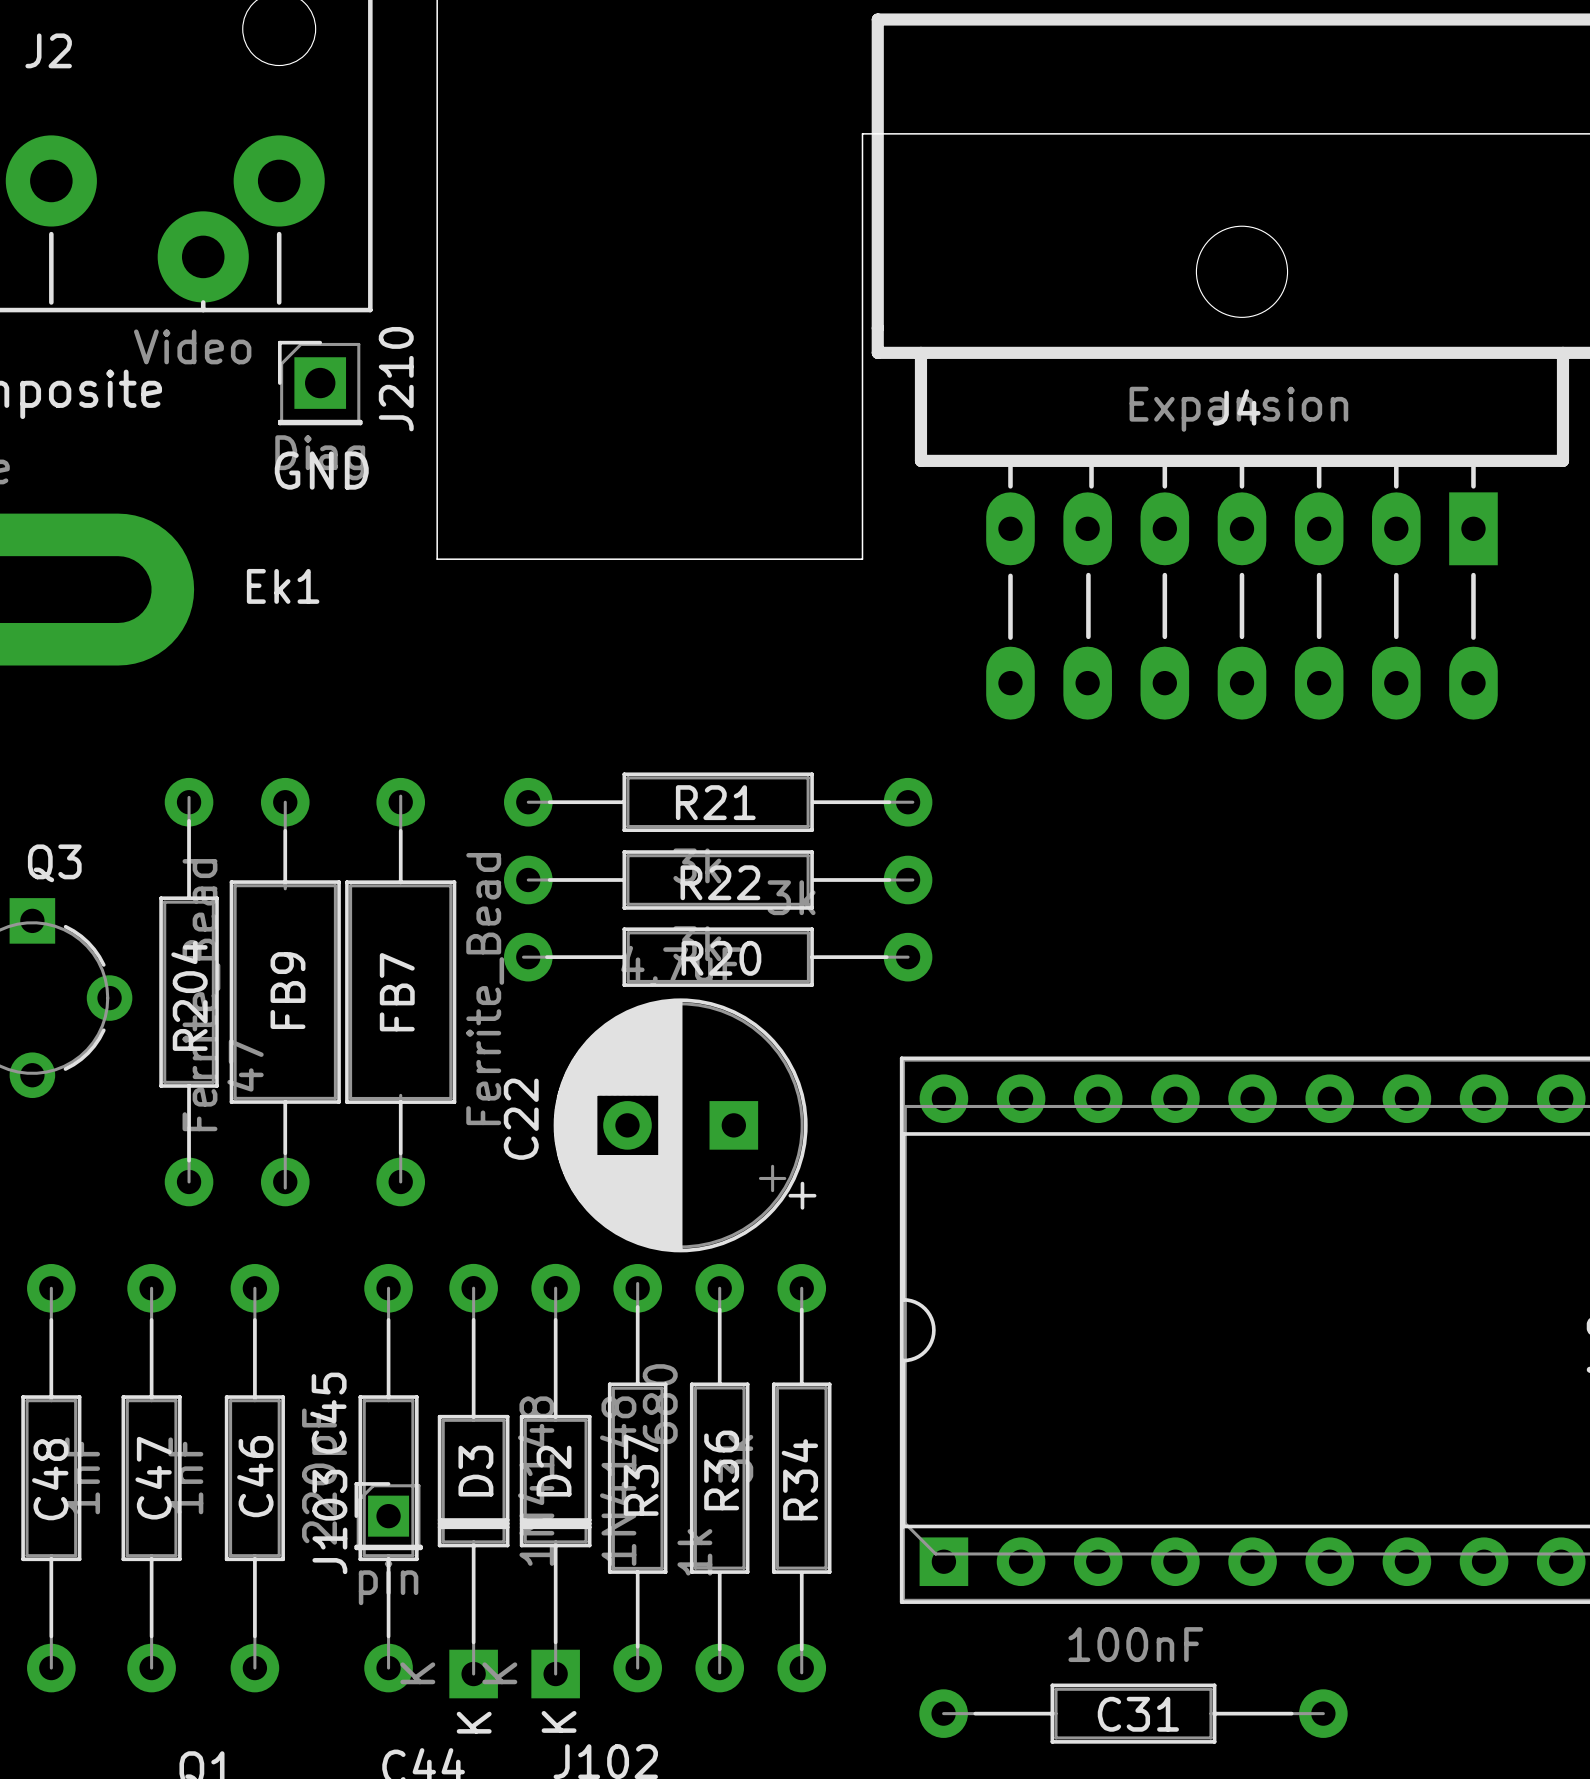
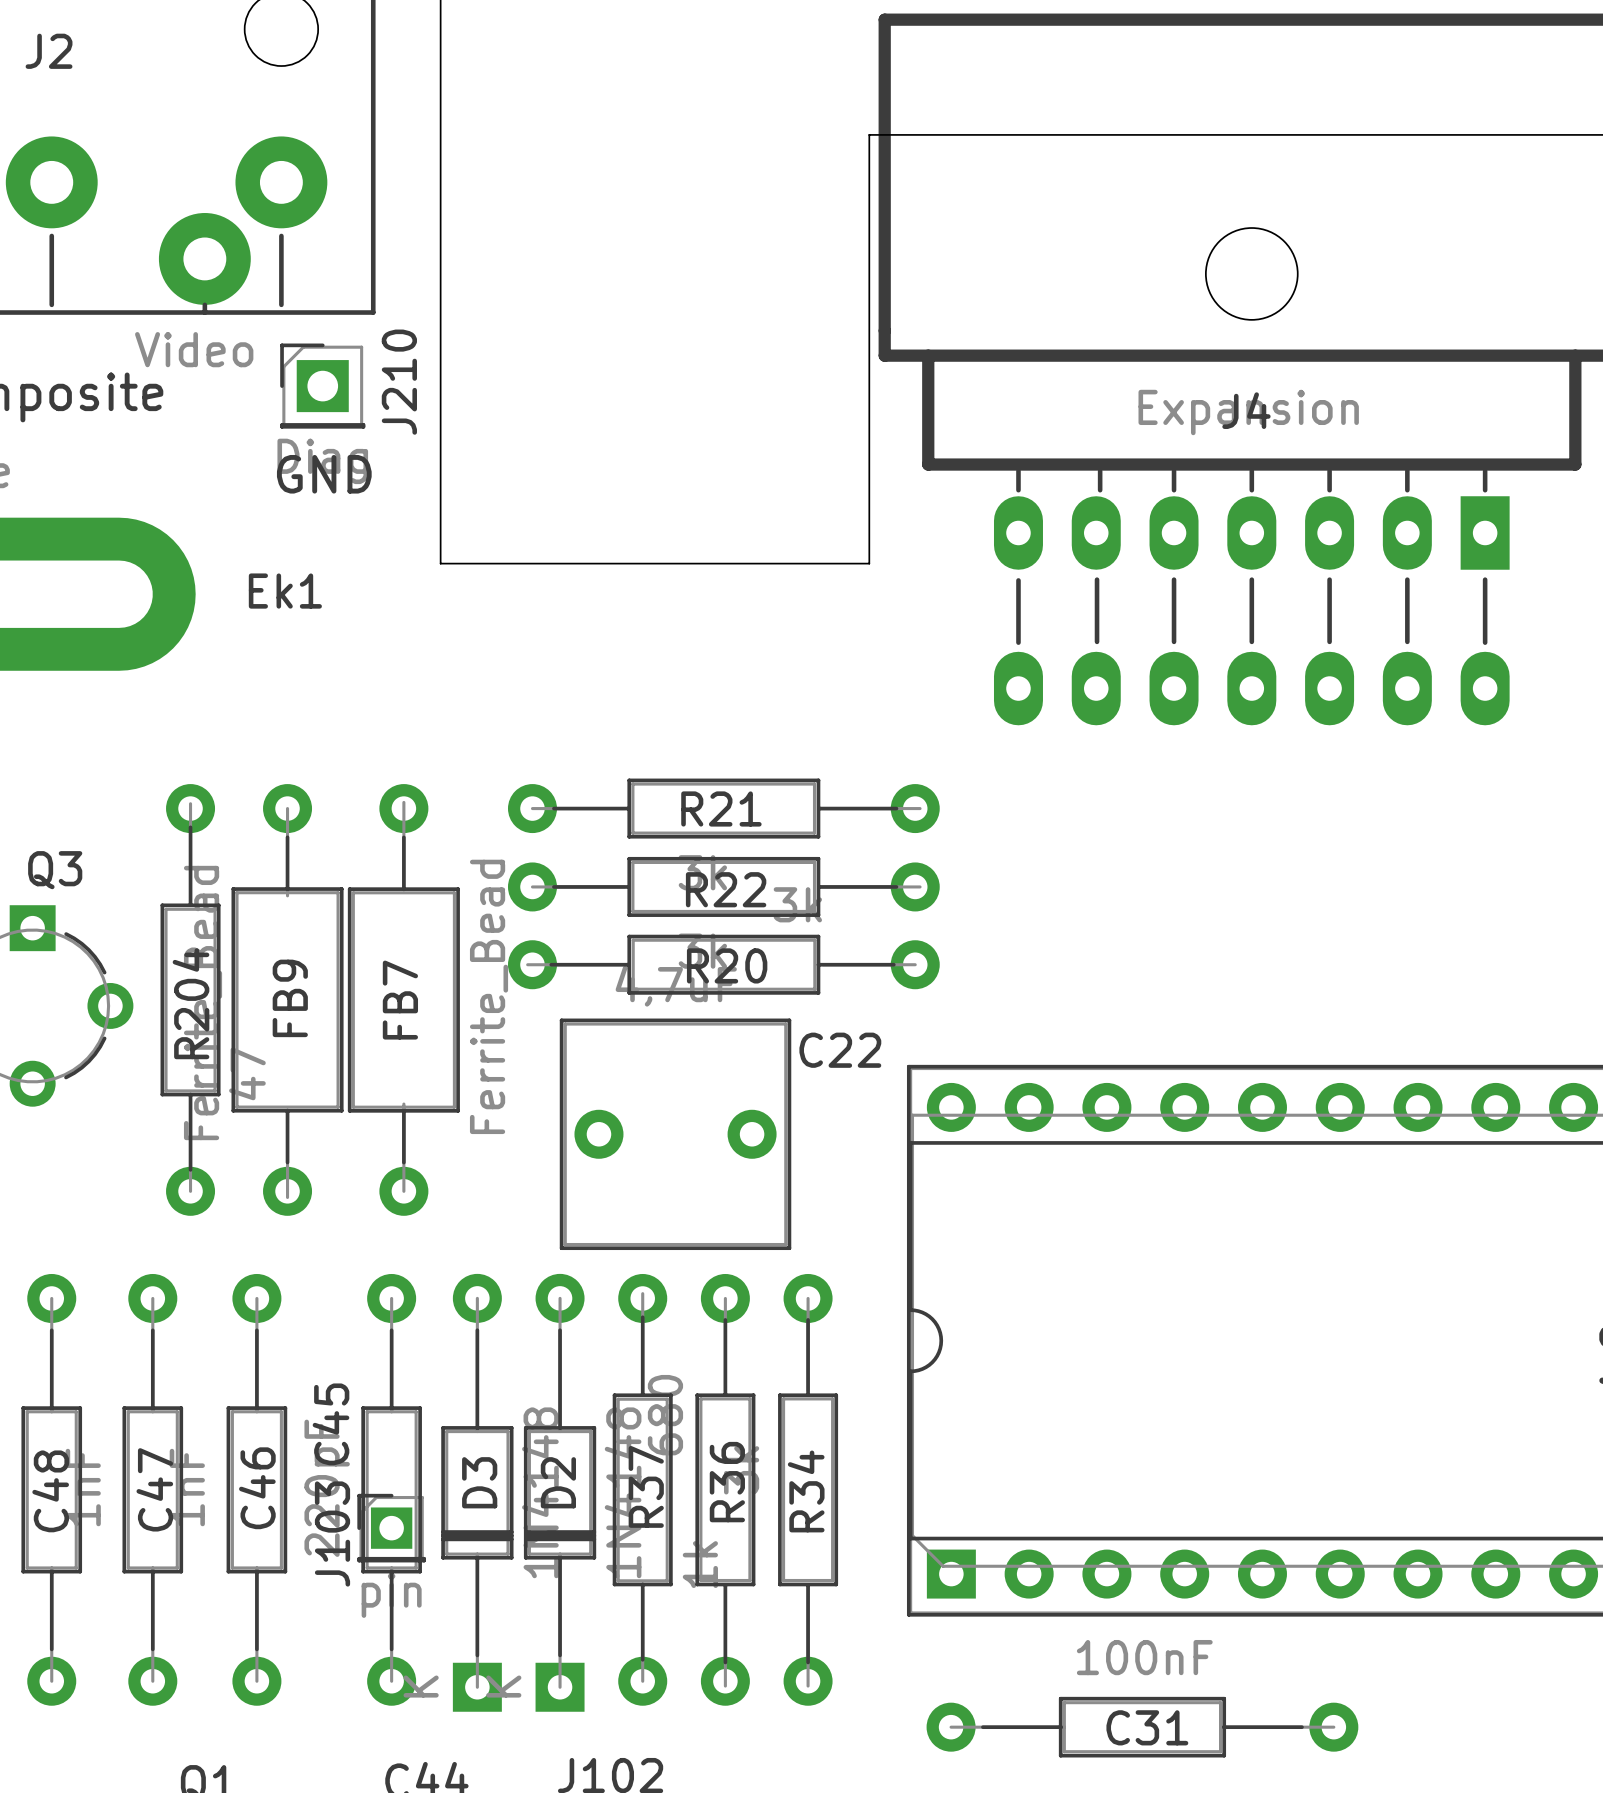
C22 footprint: [553, 998, 817, 1253] -> [559, 1018, 792, 1251]
C22 name position: C22 (521, 1119) -> C22 (840, 1050)
D2 text: K (559, 1721) -> none
D3 text: K (474, 1722) -> none

